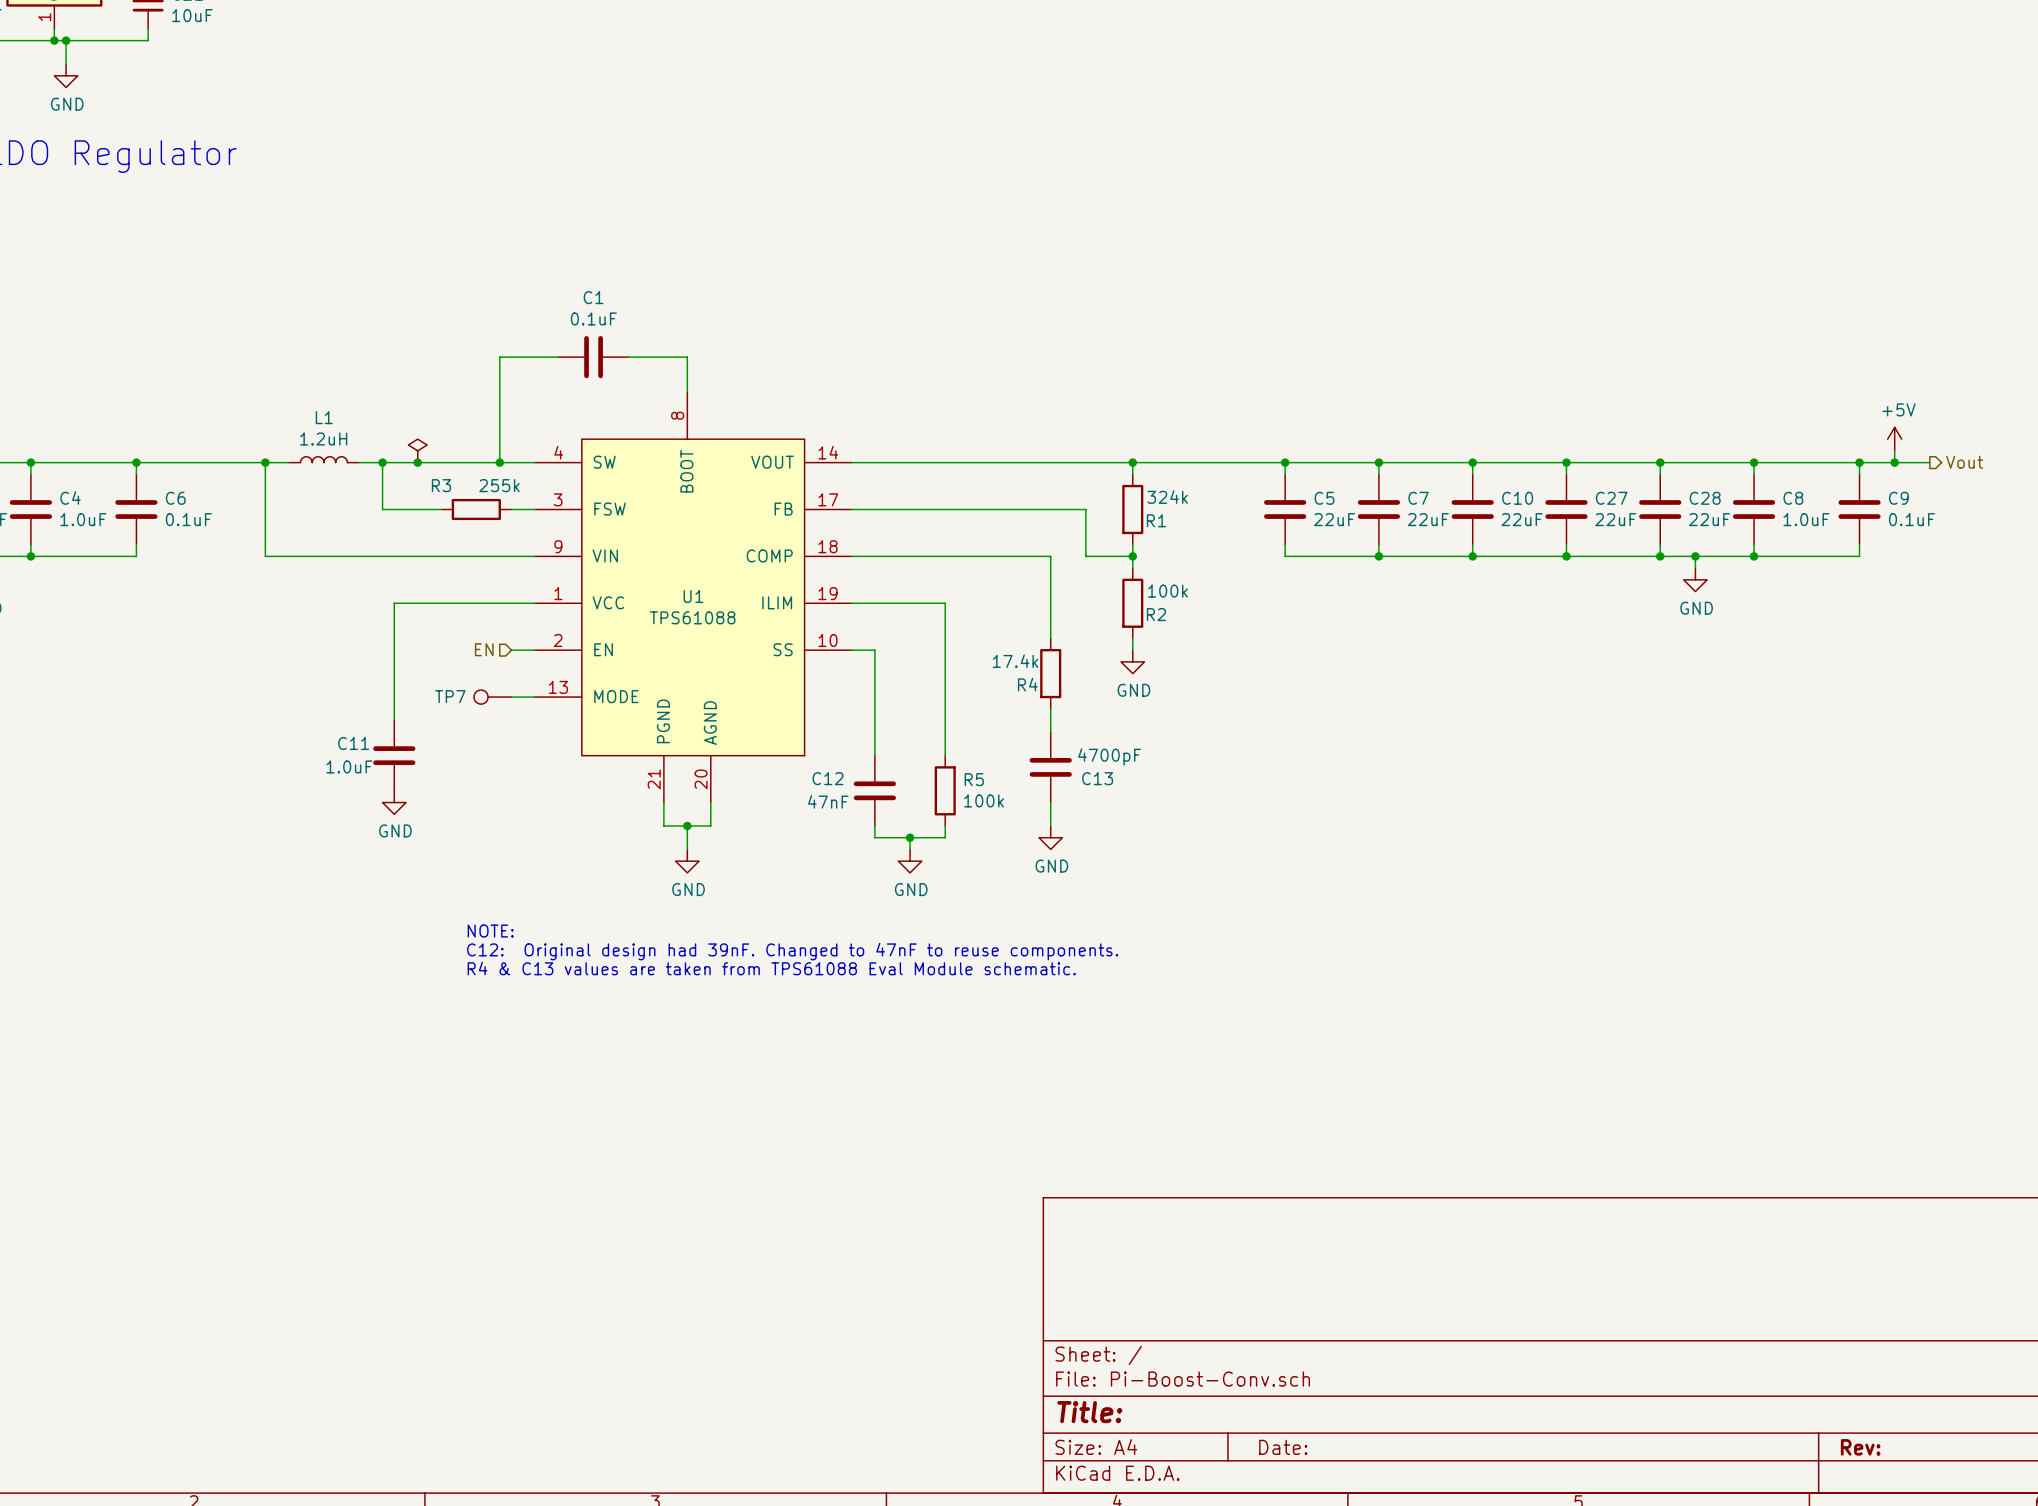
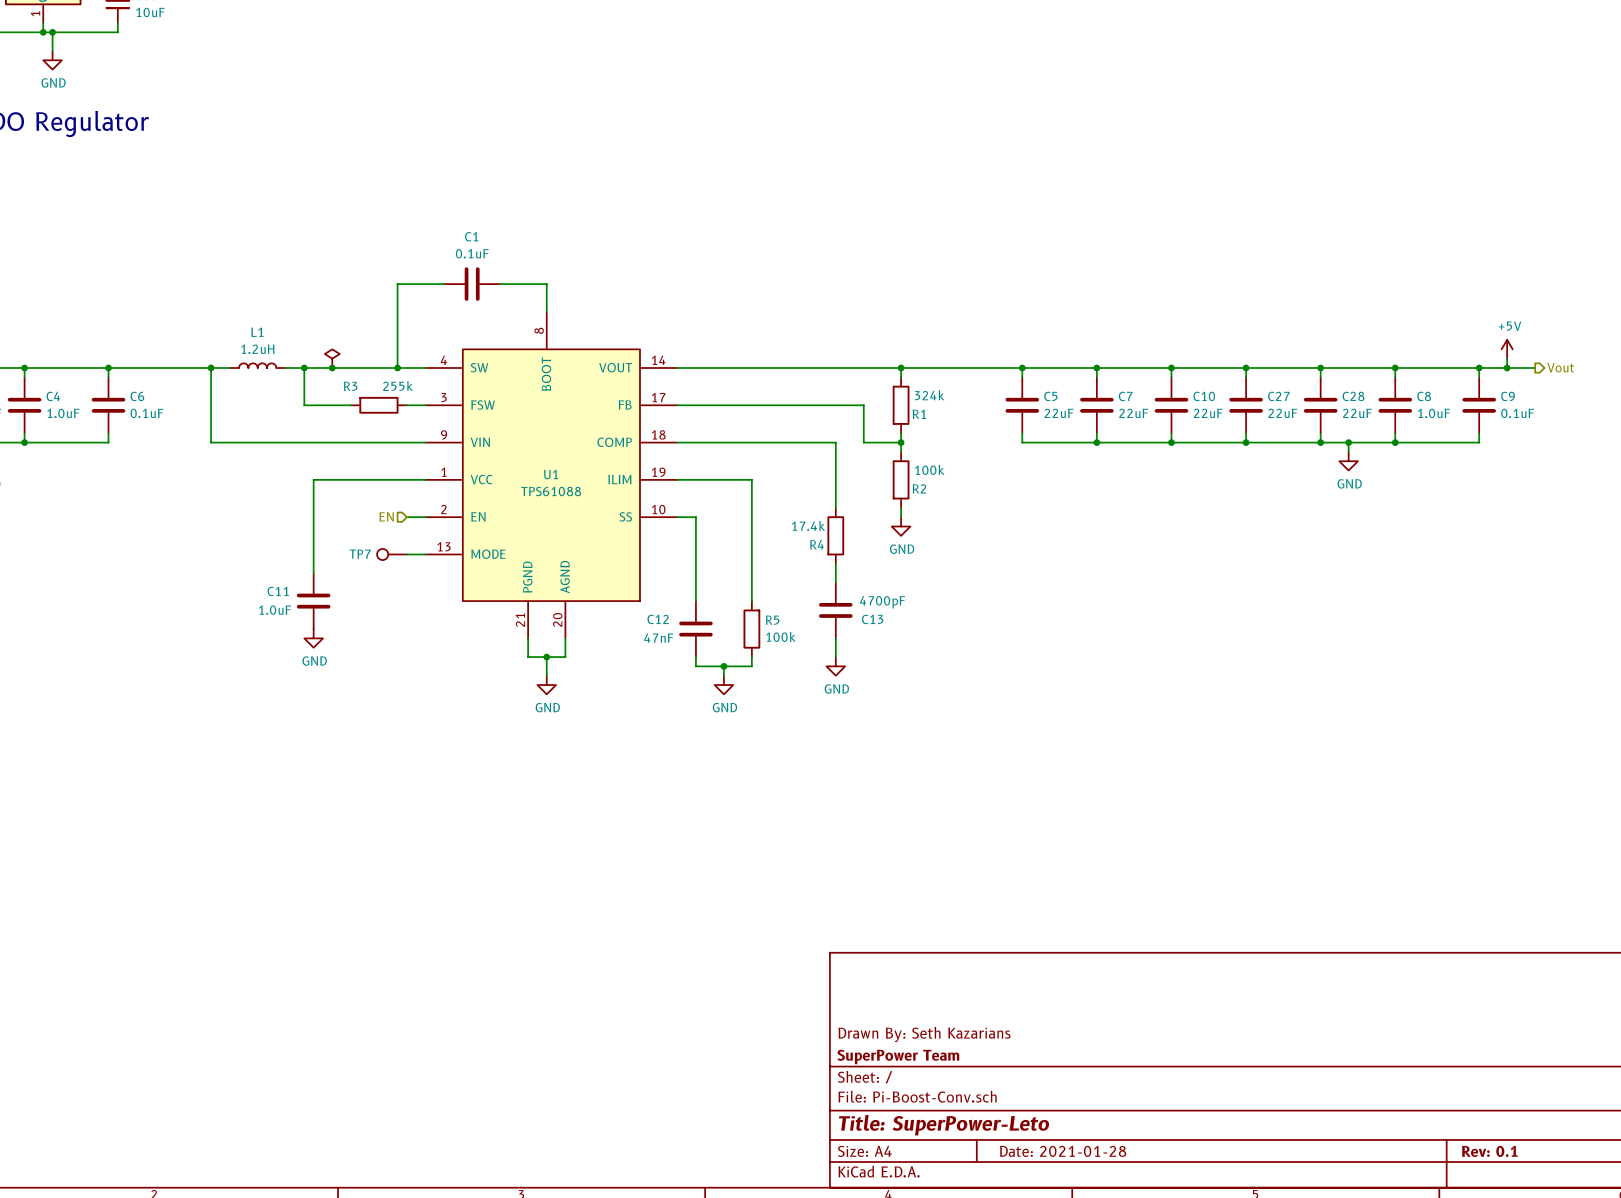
text: NOTE: (490, 931) -> none
text: C12: Original design had 39nF. Changed to 47nF to reuse components. (792, 951) -> none
text: R4 & C13 values are taken from TPS61088 Eval Module schematic. (771, 968) -> none
title block: none -> Drawn By: Seth Kazarians (924, 1034)
title block: none -> SuperPower Team (898, 1056)
title block: Title: (1089, 1412) -> Title: SuperPower-Leto (944, 1125)
title block: Date: (1283, 1447) -> Date: 2021-01-28 (1063, 1151)
title block: Rev: (1860, 1447) -> Rev: 0.1 (1489, 1151)

